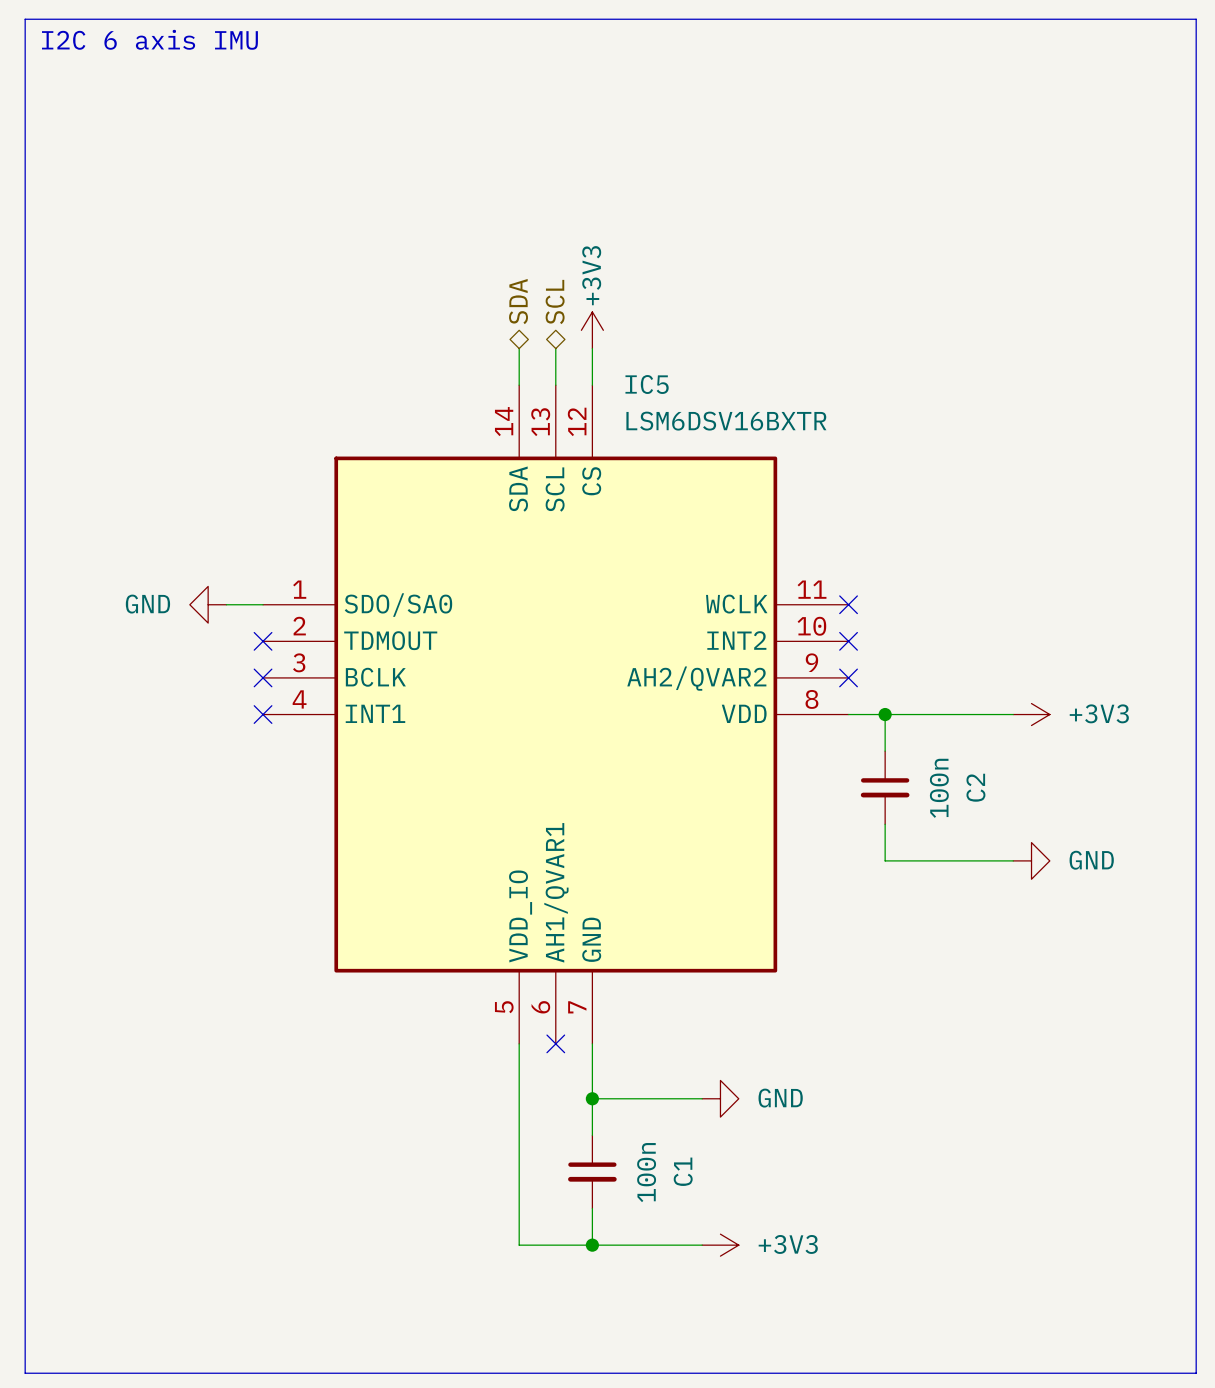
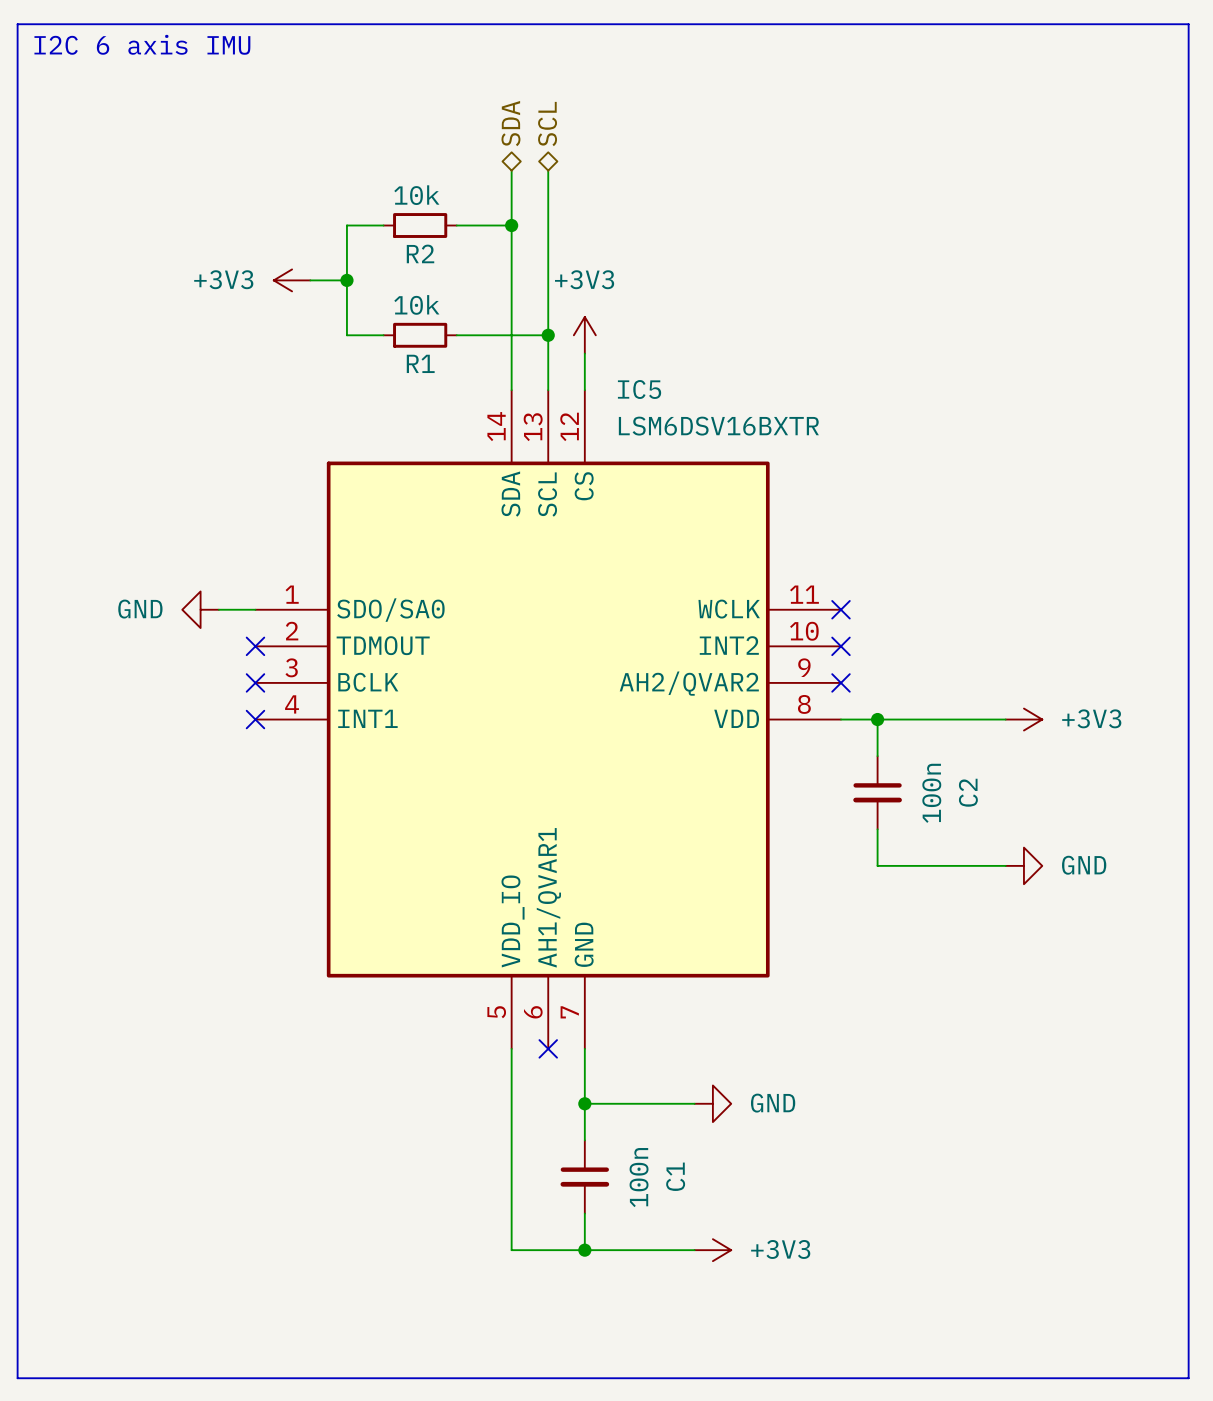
wire: none -> (511, 170) (511, 353)
wire: none -> (548, 170) (548, 353)
wire: none -> (383, 225) (346, 225) (346, 335) (383, 335)
R2: none -> 10k (420, 225)
wire: none -> (456, 225) (511, 225)
junction: none -> (511, 225)
power symbol: none -> +3V3 (292, 280)
wire: none -> (310, 280) (346, 280)
junction: none -> (346, 280)
power symbol text rotation: 0° (591, 275) -> 90° clockwise (584, 279)
hierarchical label position: SDA (518, 301) -> SDA (510, 123)
hierarchical label position: SCL (555, 302) -> SCL (547, 124)
R1: none -> 10k (420, 335)
wire: none -> (456, 335) (548, 335)
junction: none -> (548, 335)

